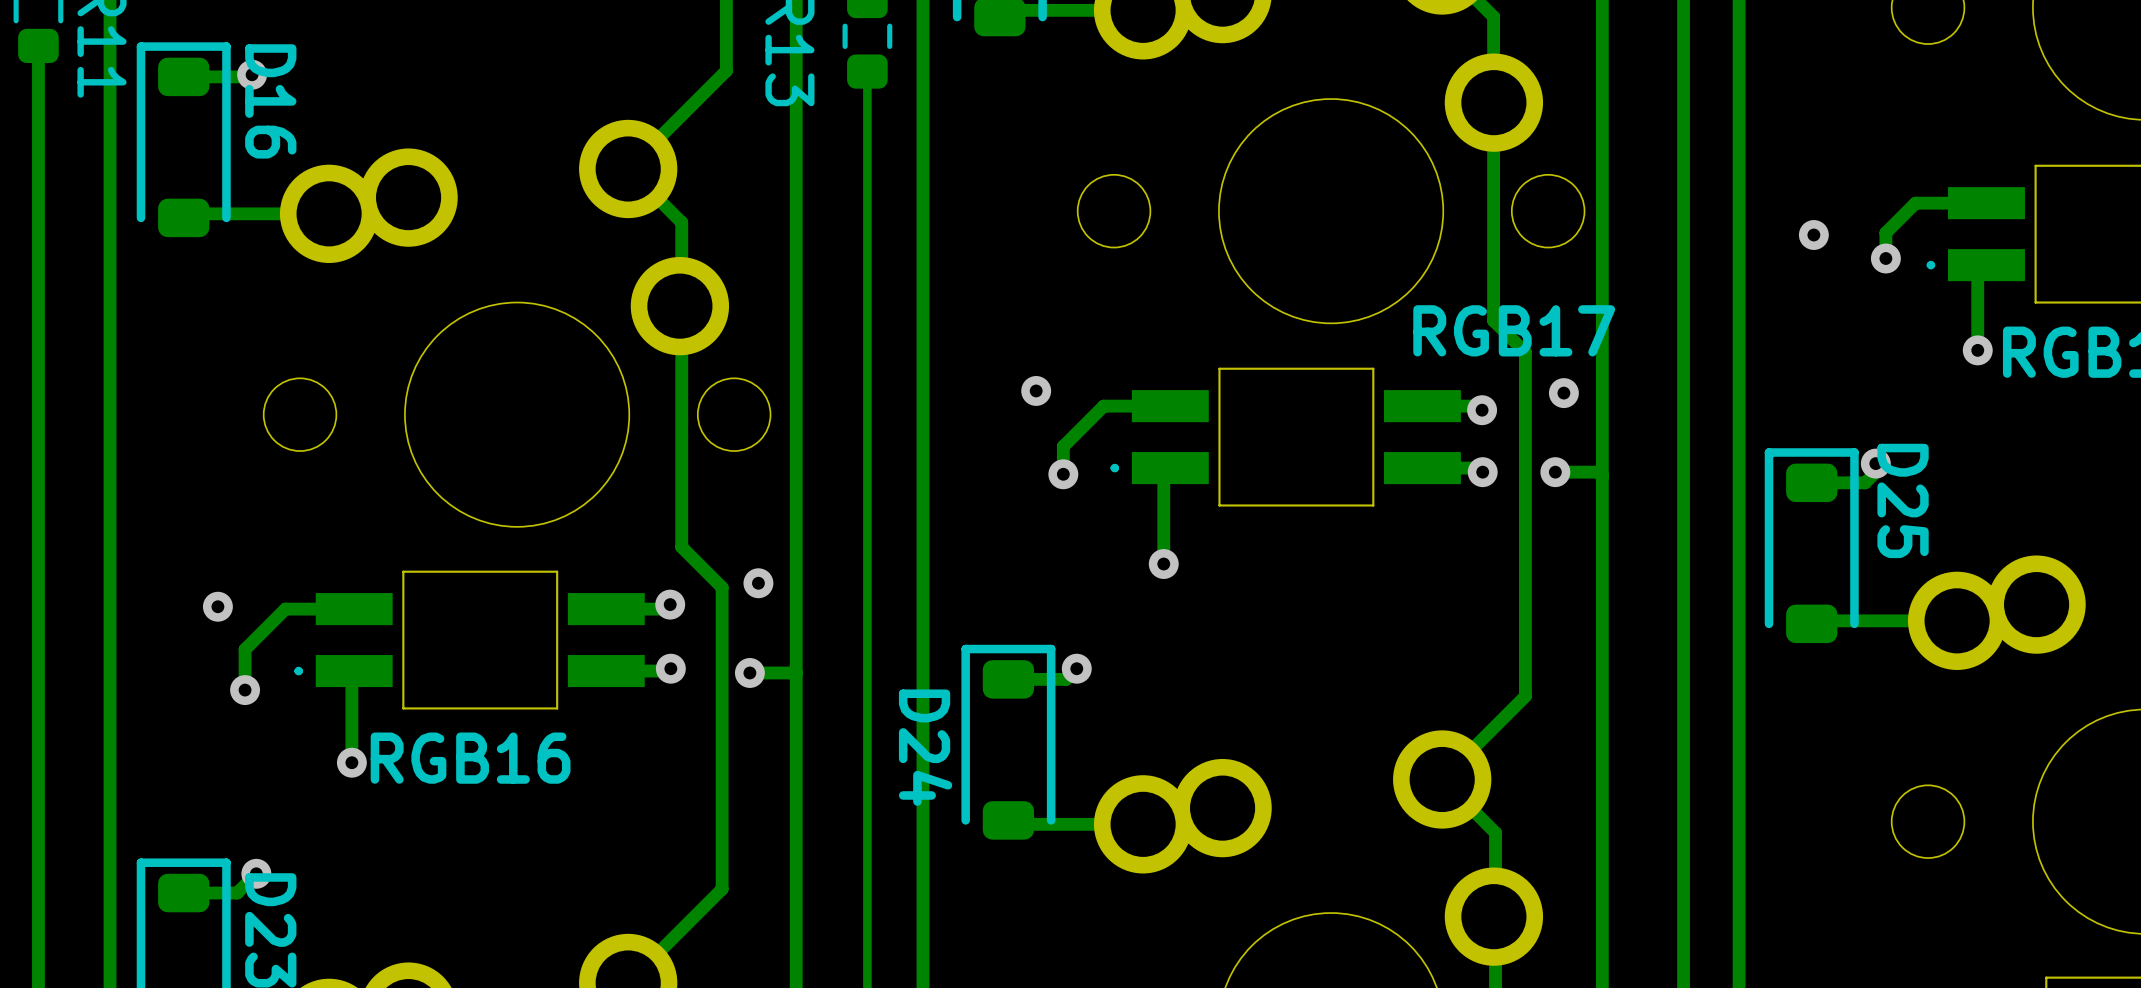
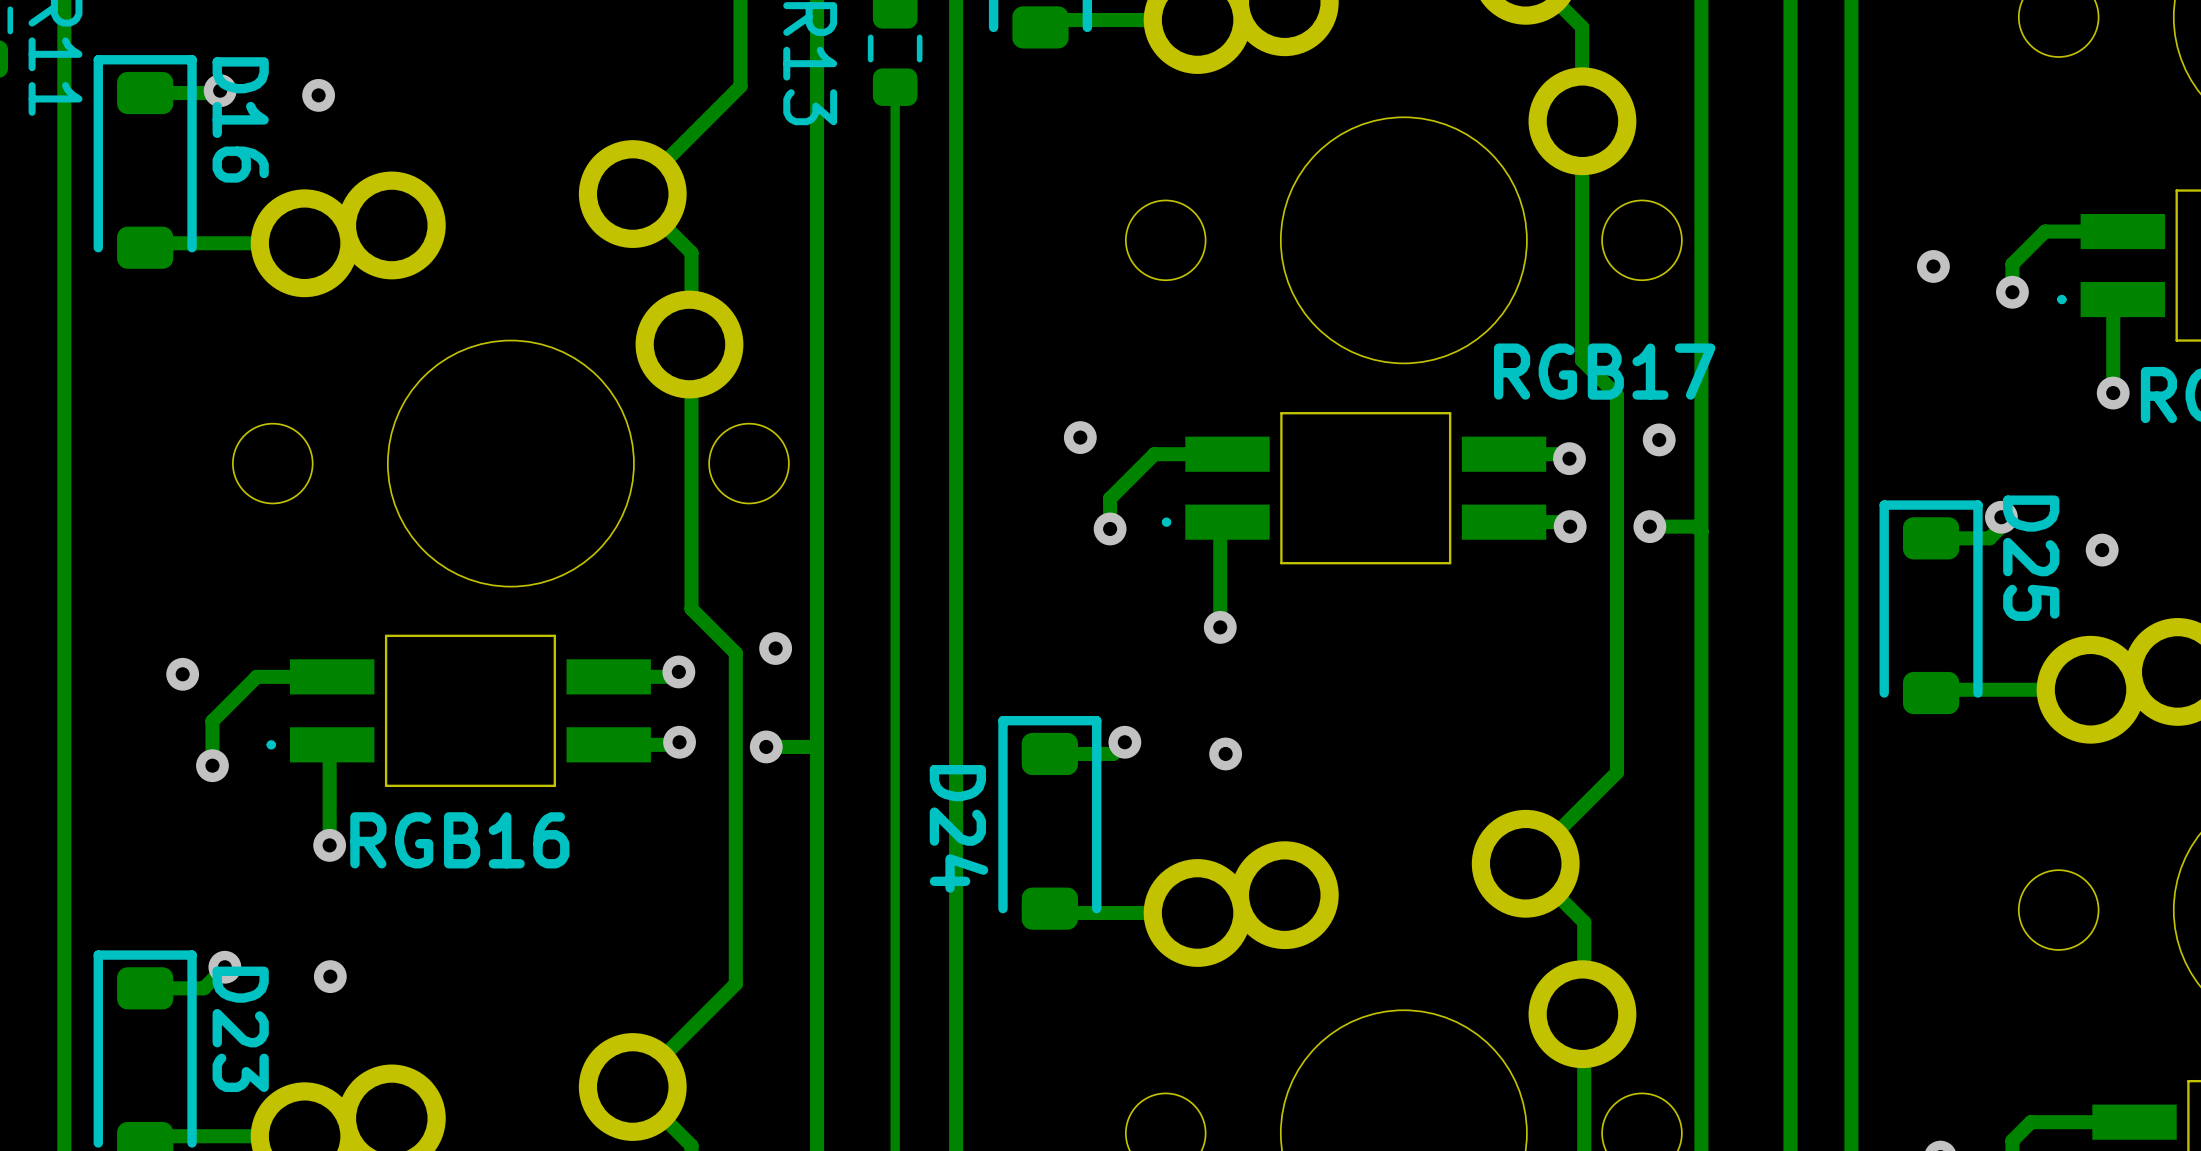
via: none -> (318, 95)
via: none -> (2102, 550)
via: none -> (1225, 753)
via: none -> (330, 976)

